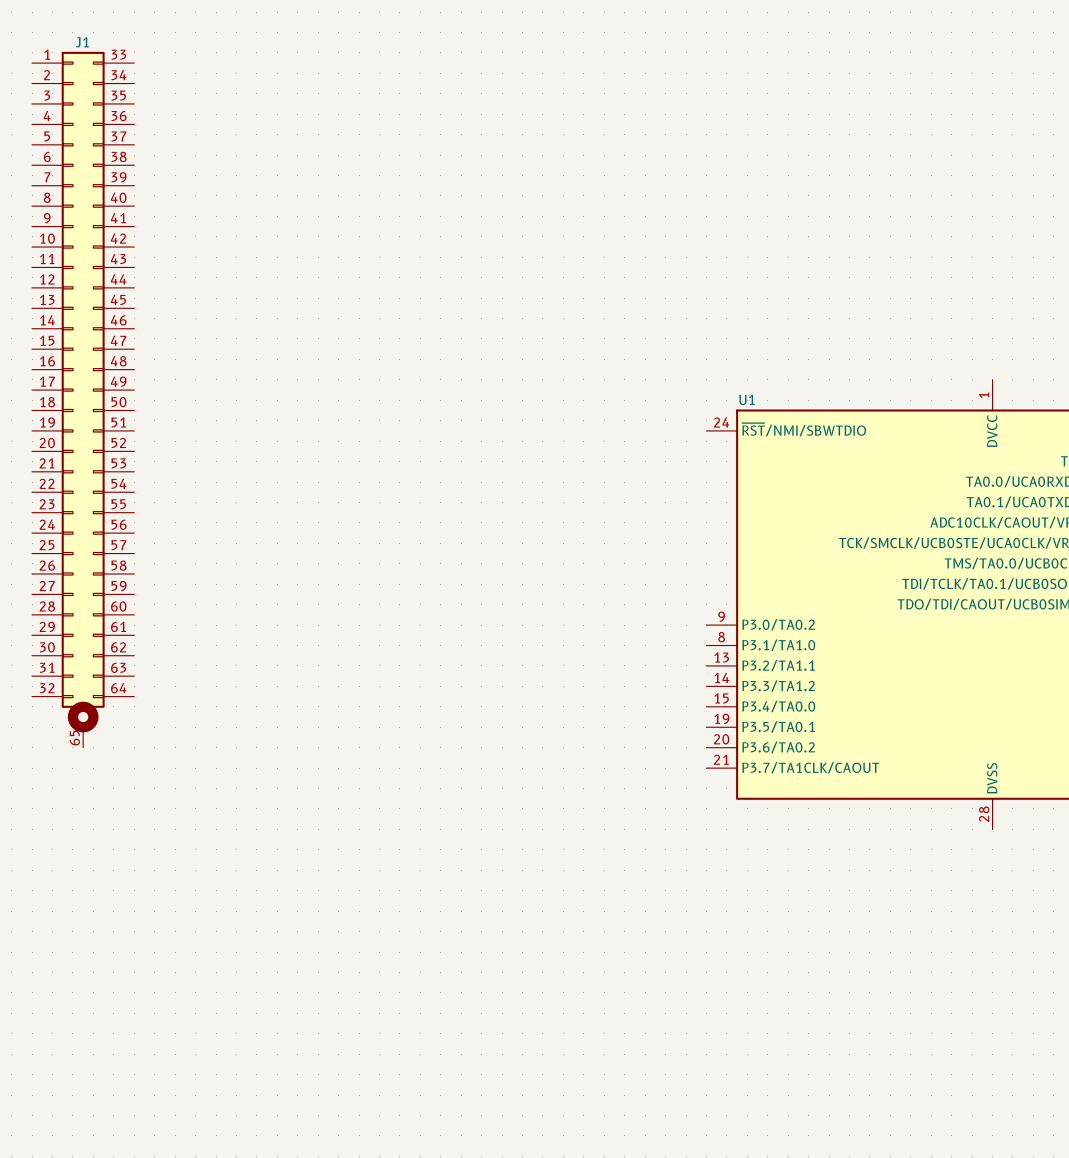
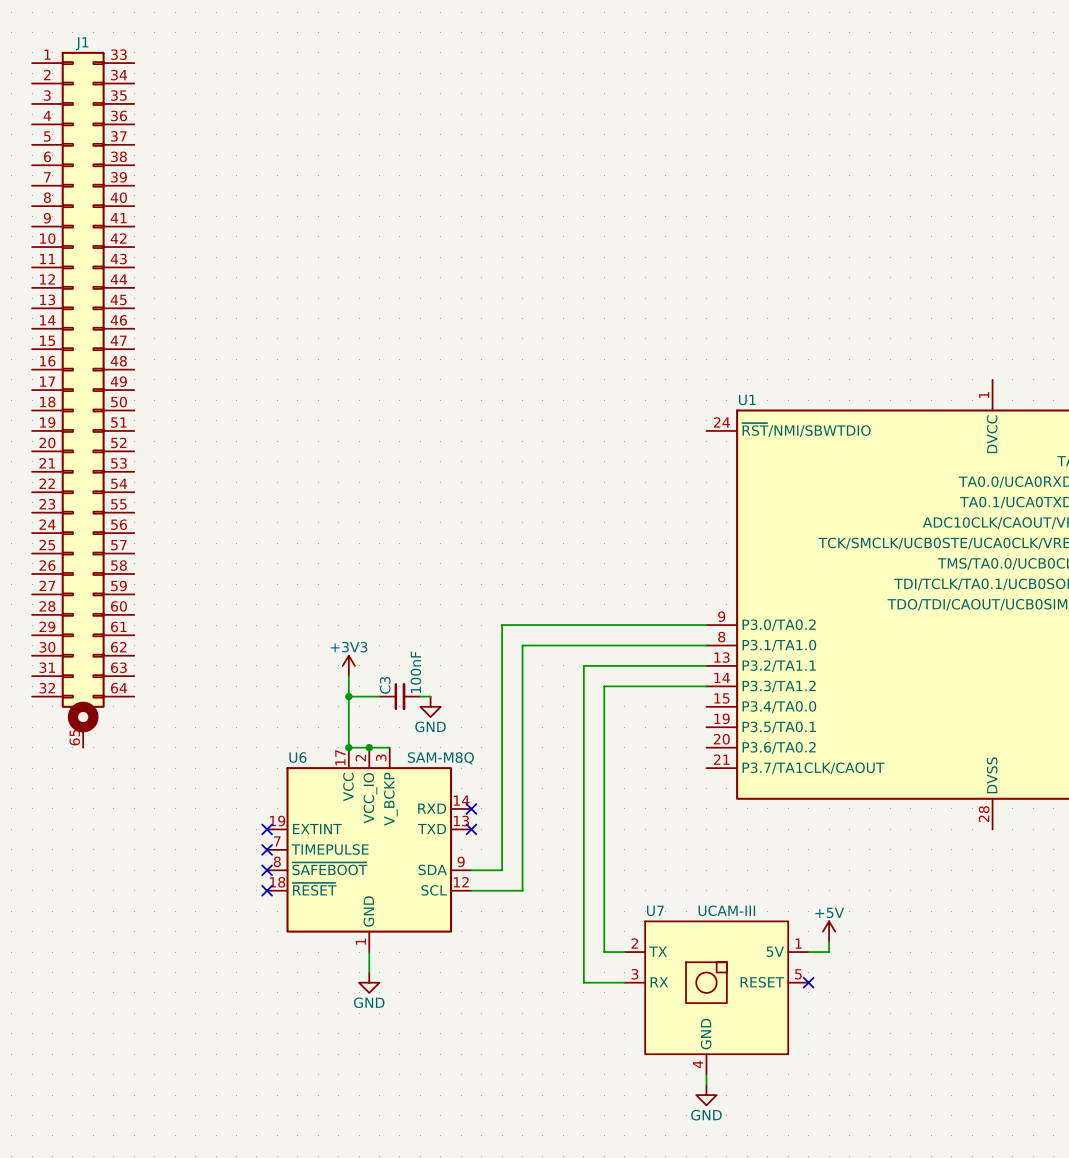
wire: none -> (706, 625) (502, 625) (502, 870) (471, 870)
wire: none -> (706, 645) (522, 645) (522, 890) (471, 890)
power symbol: none -> +3V3 (348, 665)
wire: none -> (706, 665) (583, 665) (583, 982) (624, 982)
wire: none -> (348, 676) (348, 747) (389, 747)
wire: none -> (706, 686) (604, 686) (604, 952) (624, 952)
wire: none -> (348, 696) (379, 696)
junction: none -> (348, 696)
C3: none -> 100nF (399, 696)
wire: none -> (420, 696) (430, 696)
power symbol: none -> GND (430, 706)
junction: none -> (348, 747)
junction: none -> (369, 747)
no-connect mark: none -> (471, 808)
no-connect mark: none -> (267, 829)
no-connect mark: none -> (471, 829)
no-connect mark: none -> (267, 849)
U6: none -> SAM-M8Q (369, 849)
no-connect mark: none -> (267, 870)
no-connect mark: none -> (267, 890)
power symbol: none -> +5V (829, 931)
wire: none -> (829, 941) (829, 952) (808, 952)
wire: none -> (369, 952) (369, 972)
power symbol: none -> GND (369, 982)
no-connect mark: none -> (808, 982)
U7: none -> UCAM-III (716, 998)
wire: none -> (706, 1074) (706, 1084)
power symbol: none -> GND (706, 1095)

